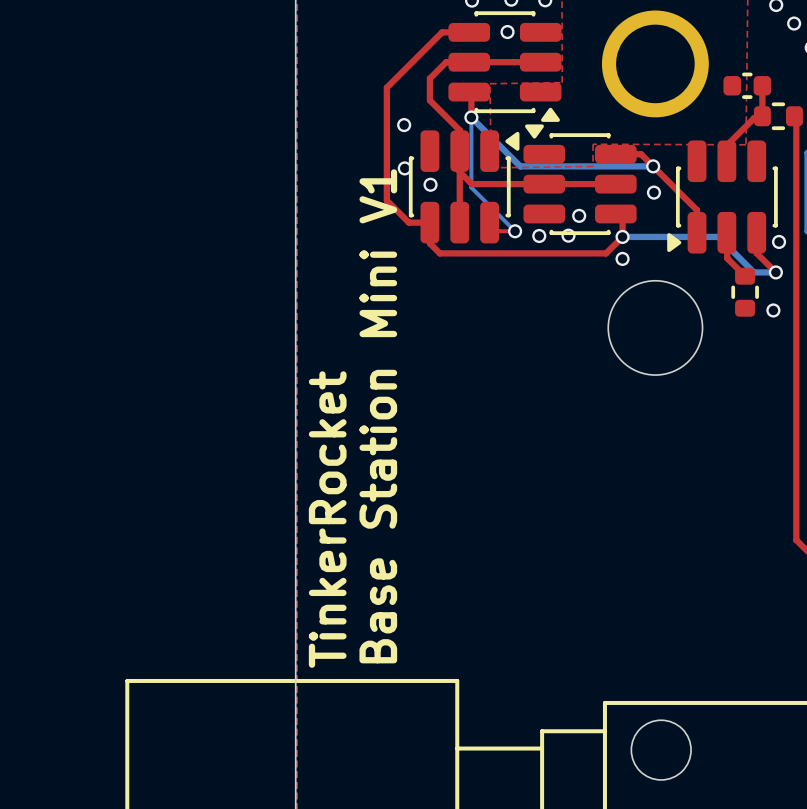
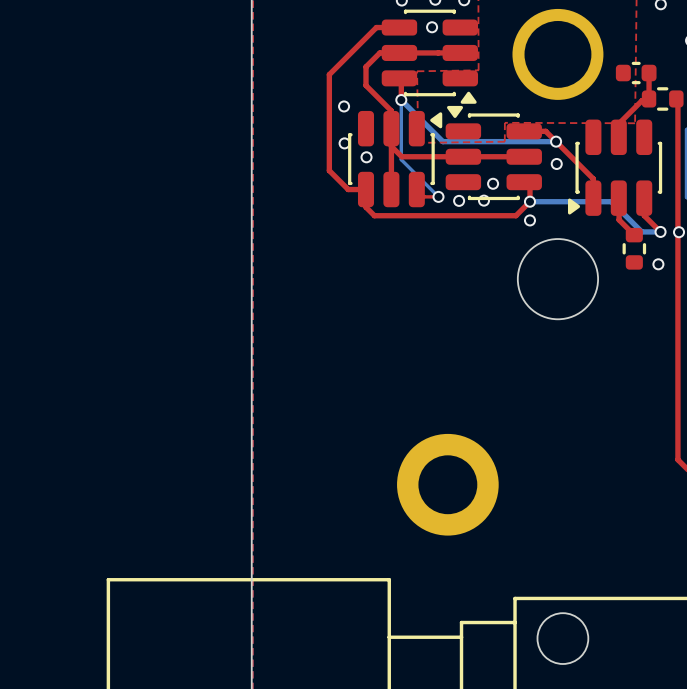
via: (794, 23) -> none
via: (779, 241) -> none
via: none -> (679, 232)
text: Base Station Mini V1 (378, 416) -> none
text: TinkerRocket (327, 519) -> none
part: none -> (447, 484)

